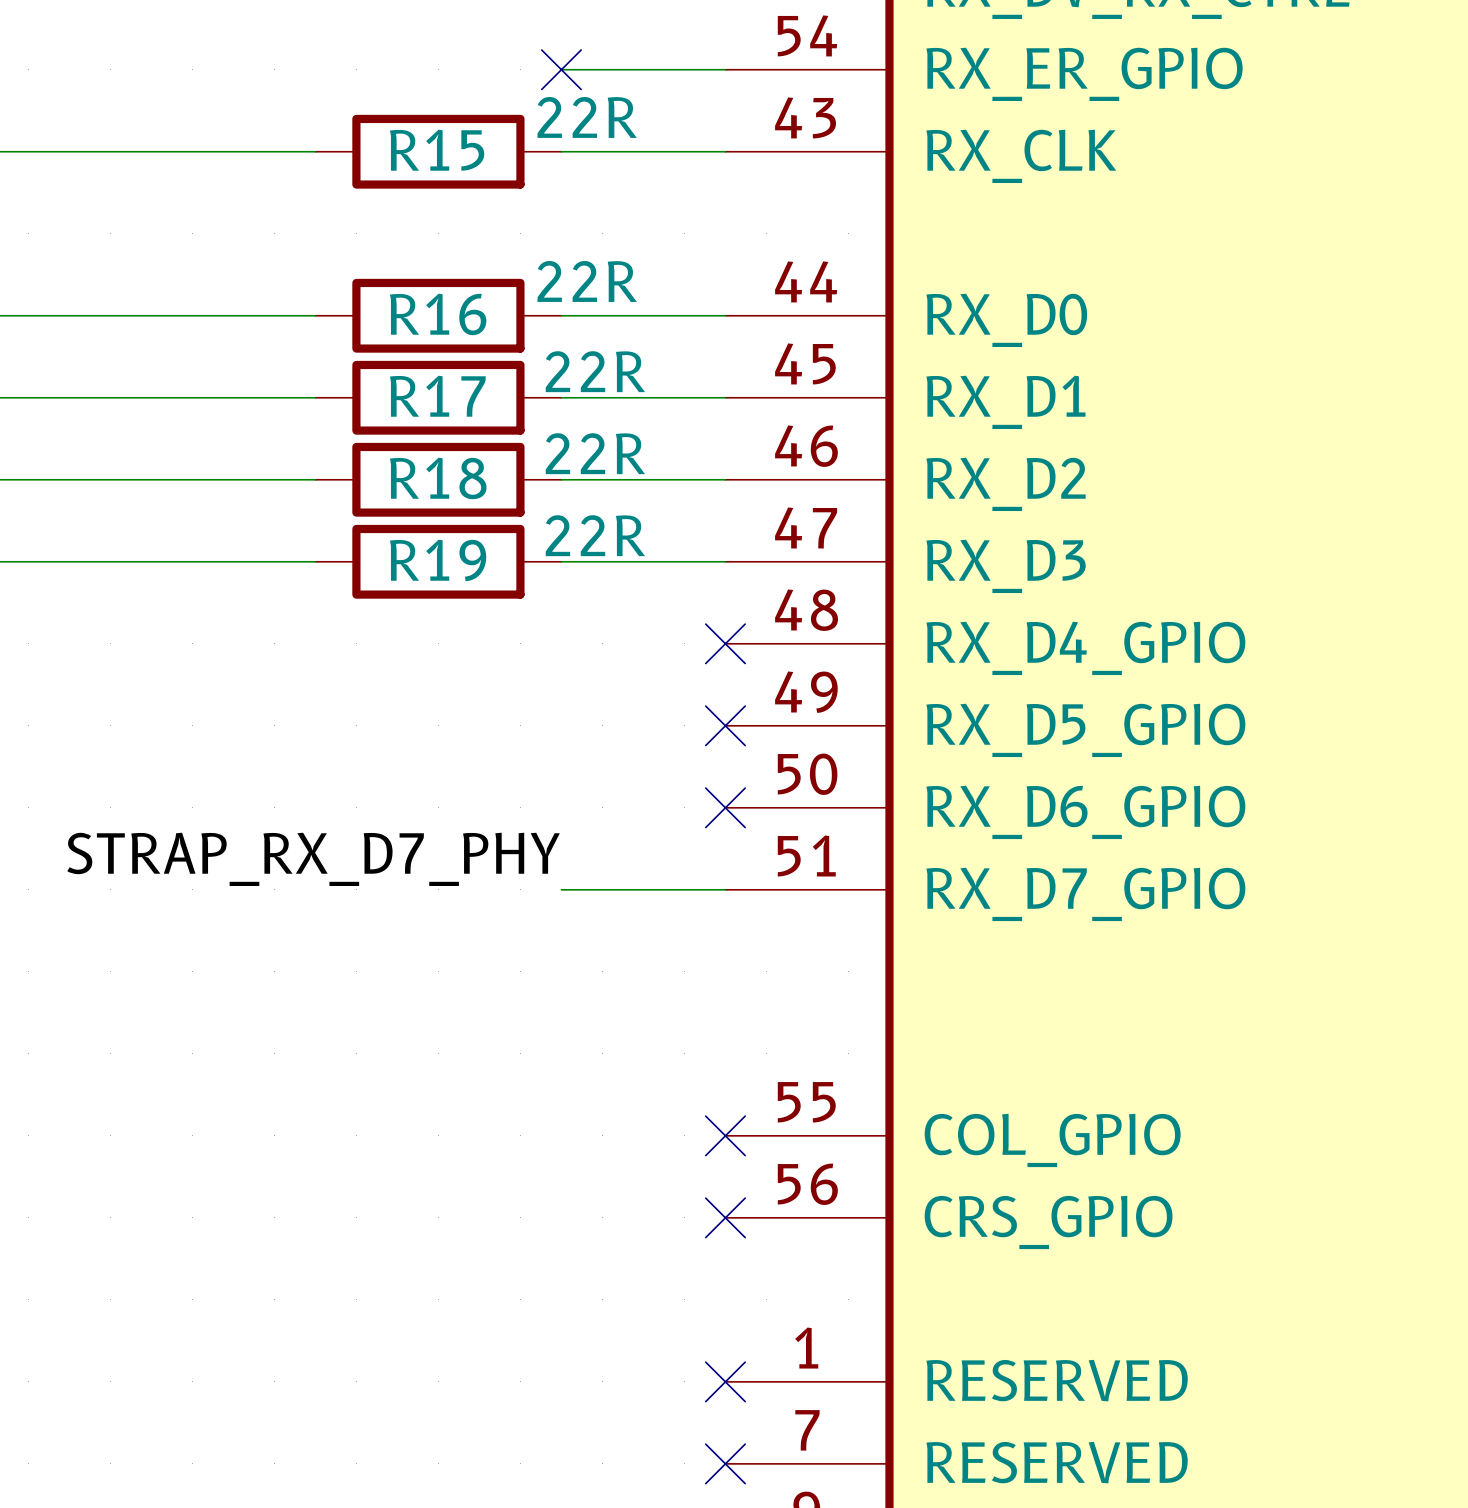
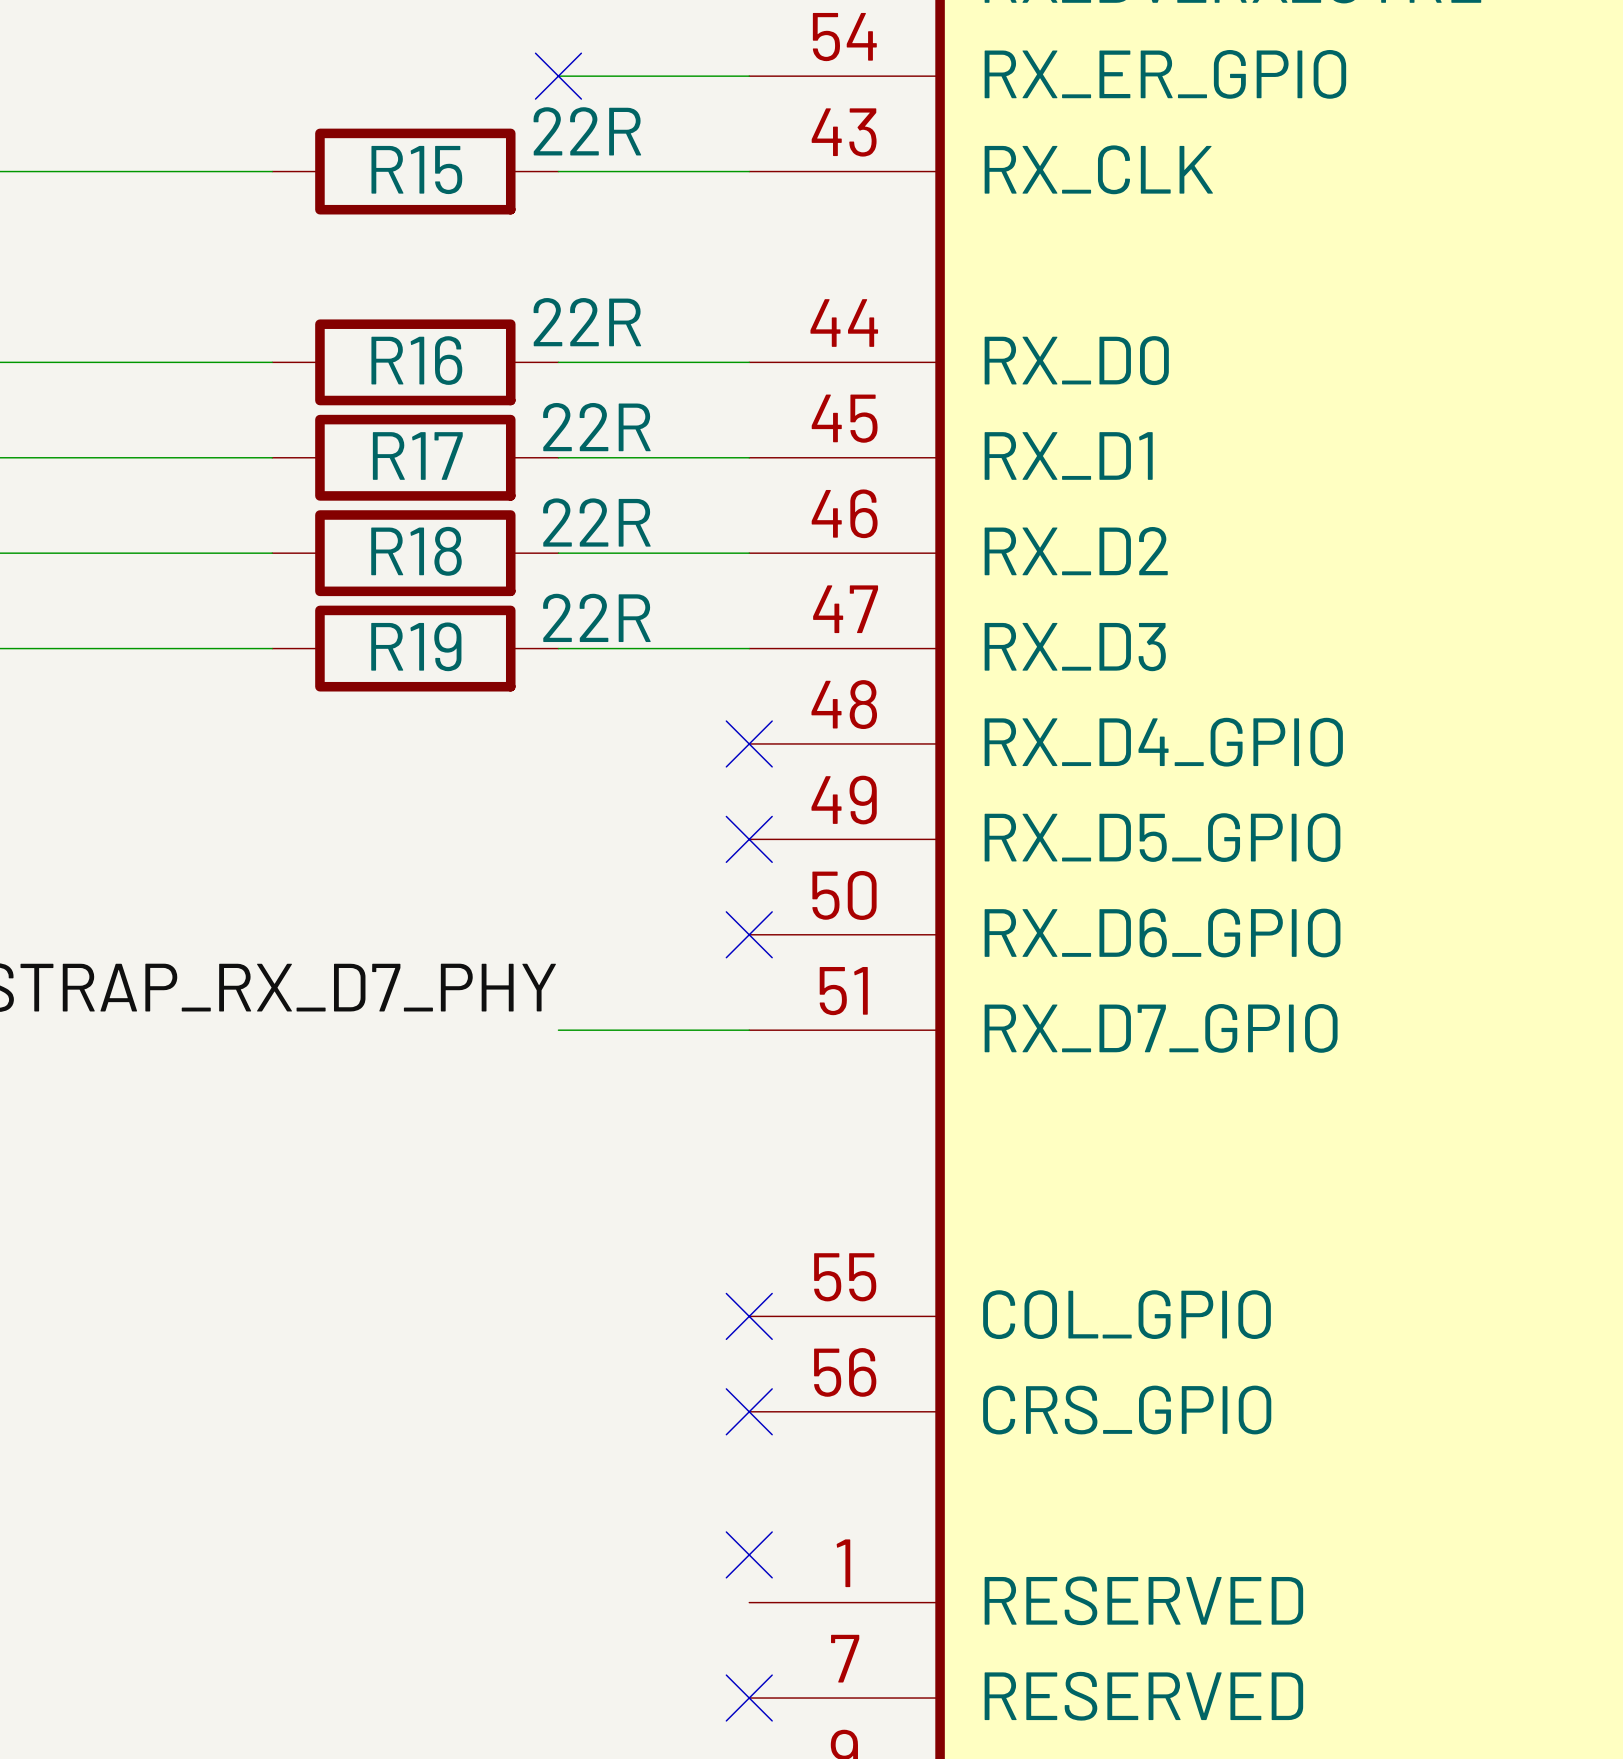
no-connect mark position: (725, 1381) -> (749, 1554)

